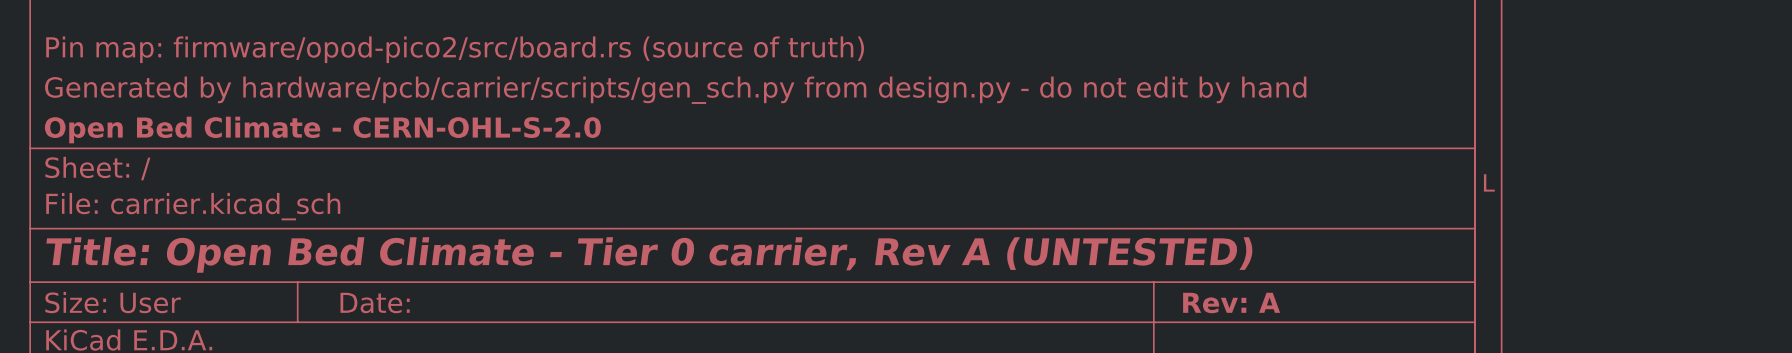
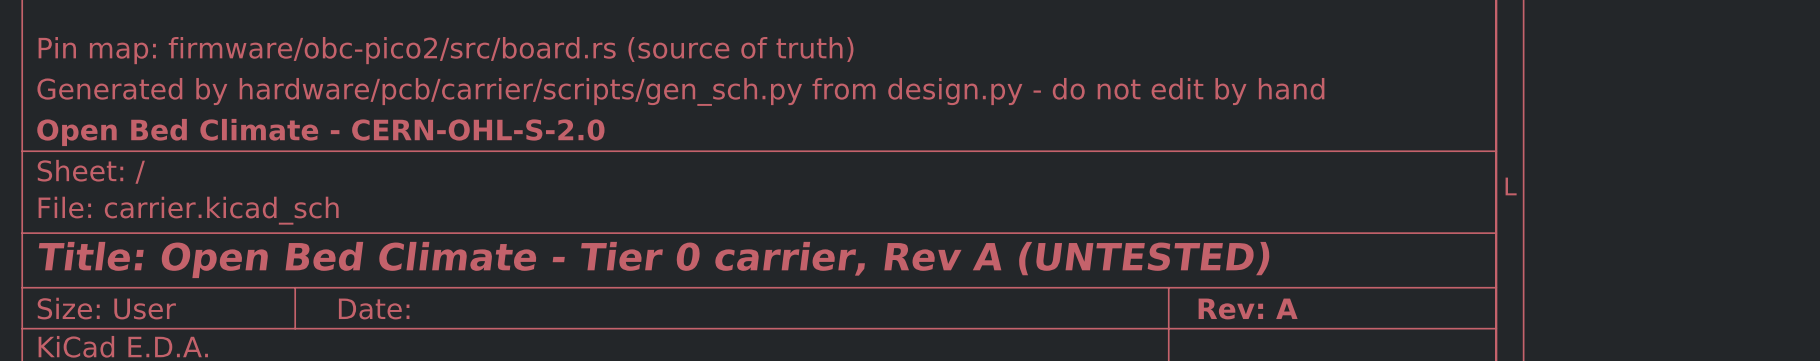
title block: Pin map: firmware/opod-pico2/src/board.rs (source of truth) (455, 49) -> Pin map: firmware/obc-pico2/src/board.rs (source of truth) (446, 50)

